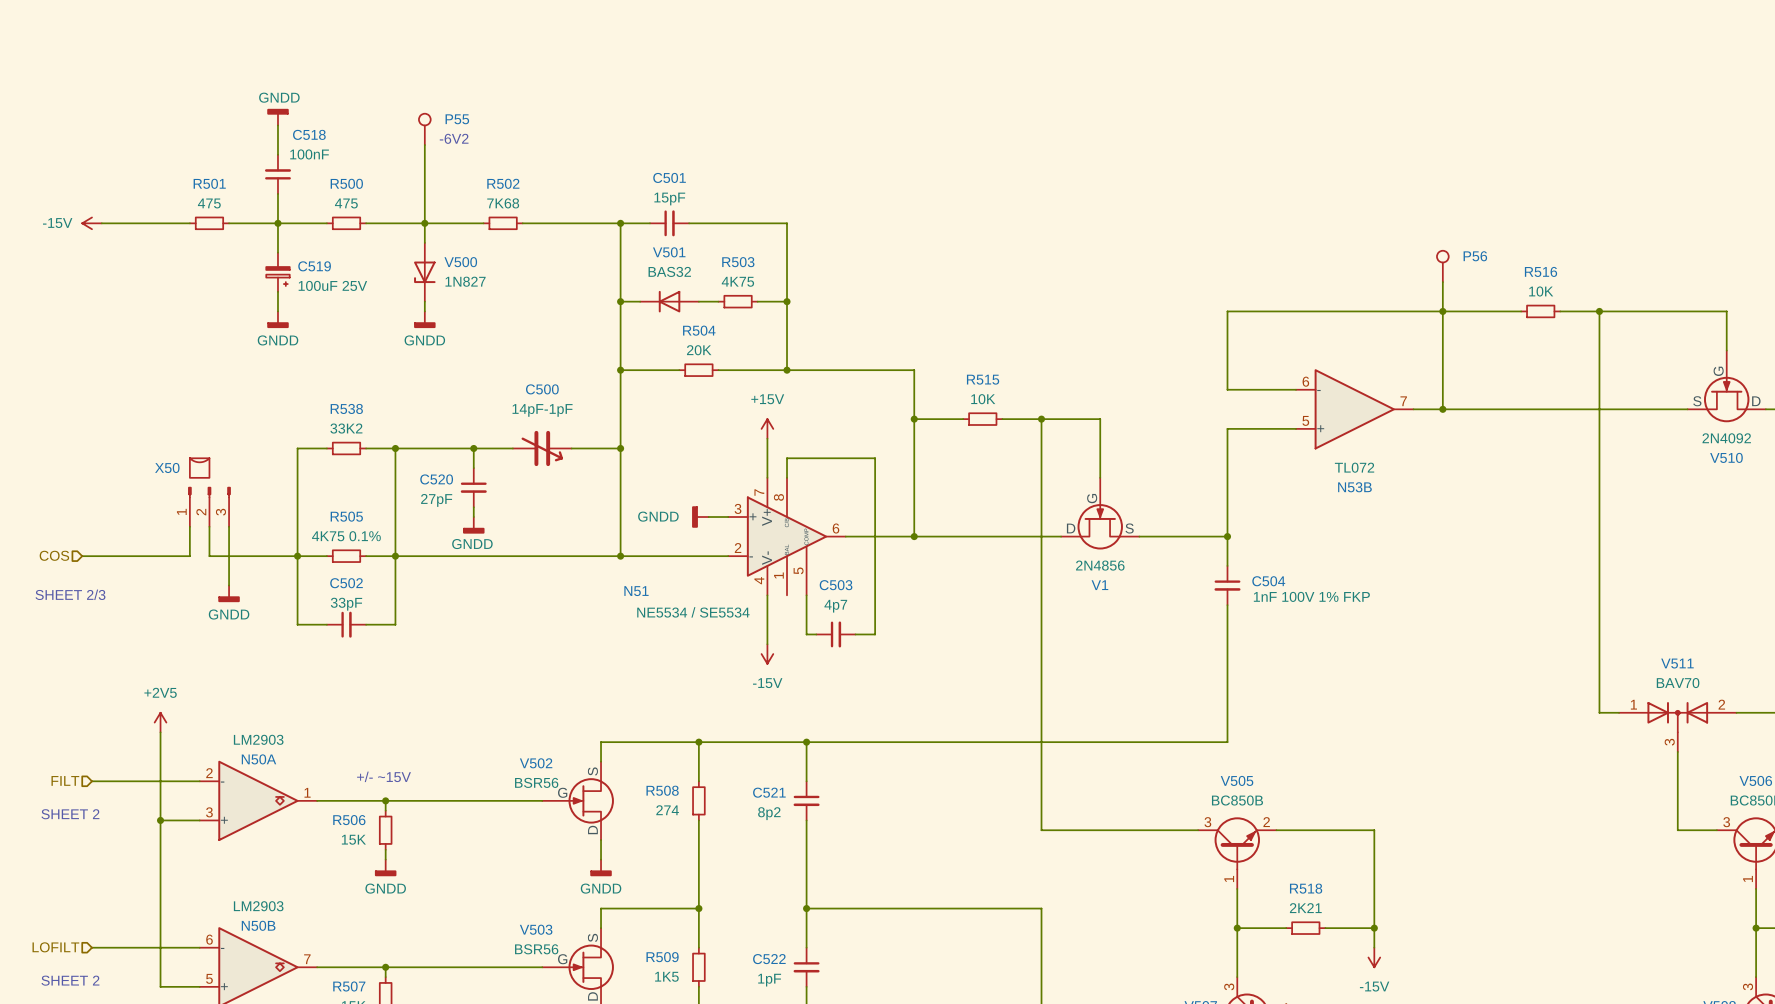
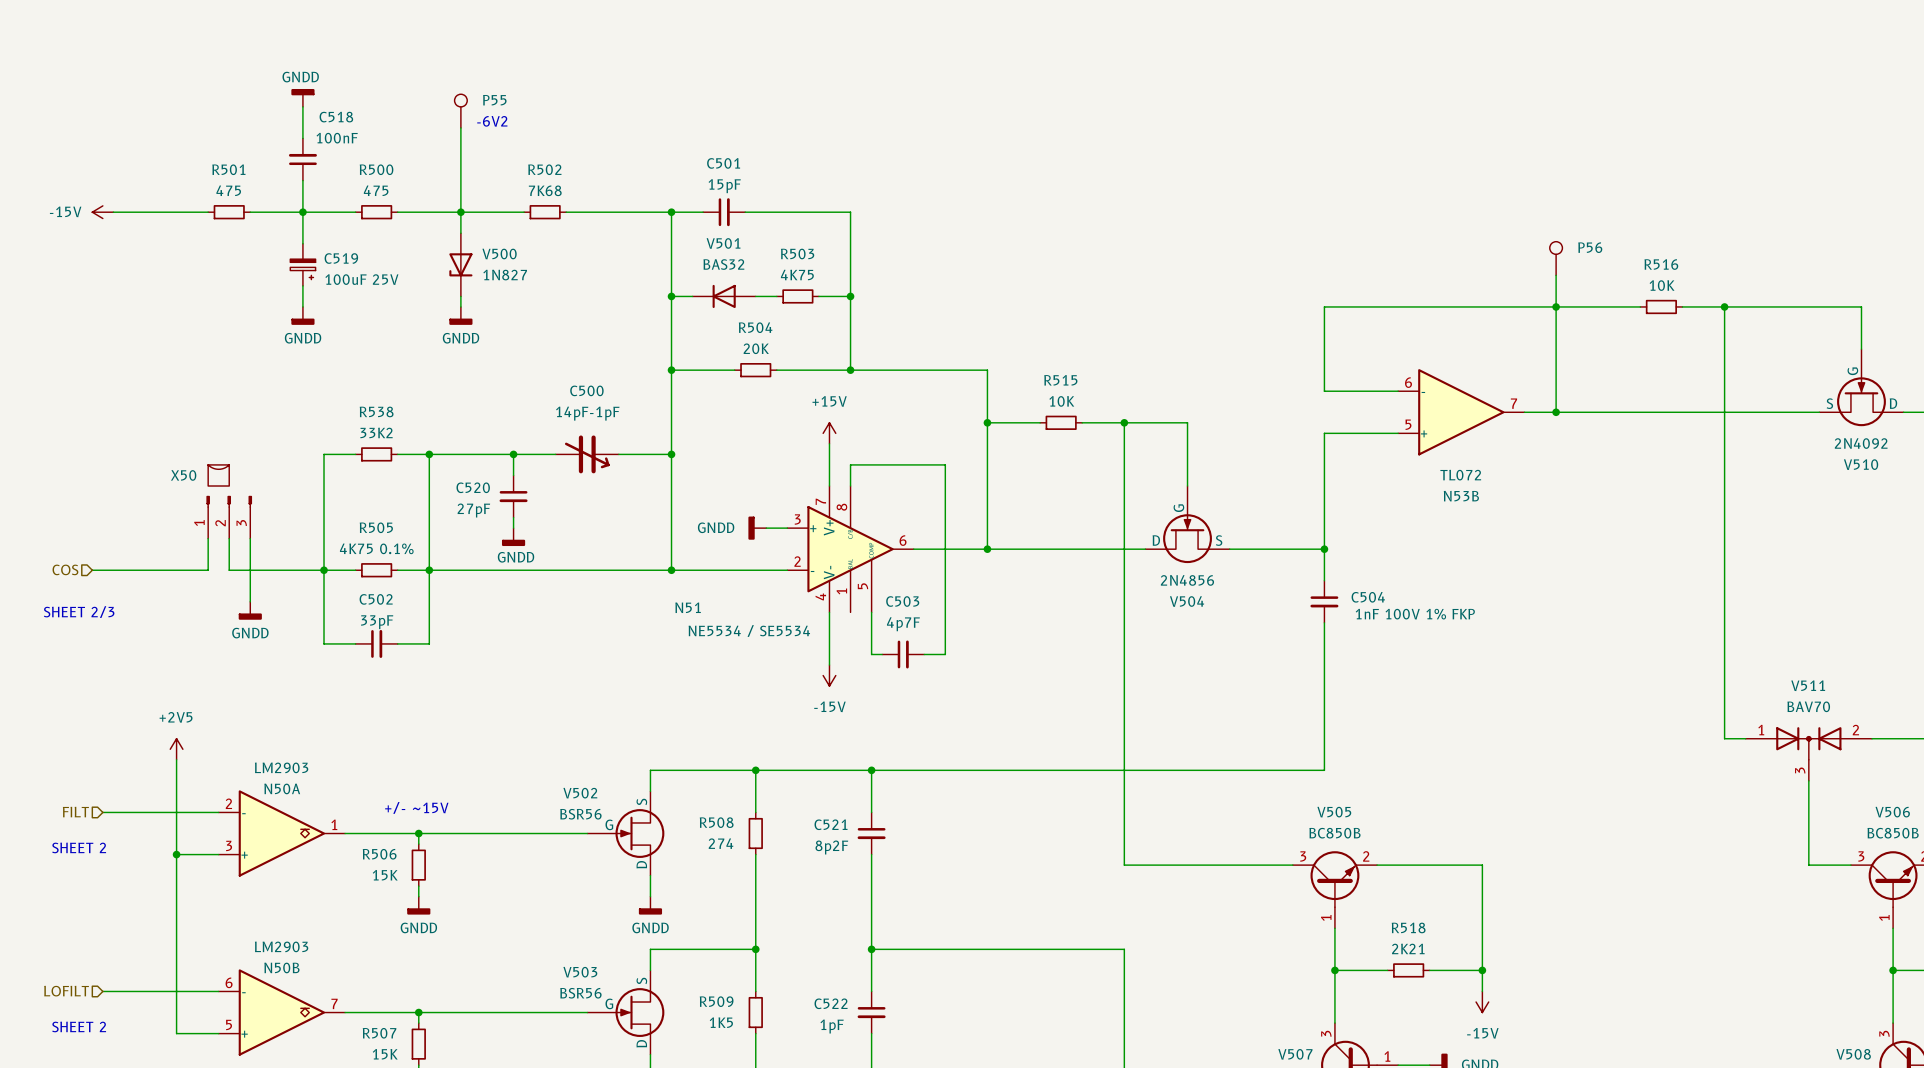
V1 name: V1 (1099, 585) -> V504 (1187, 601)
C503 value: 4p7 (835, 606) -> 4p7F (903, 624)
C521 value: 8p2 (769, 813) -> 8p2F (831, 847)

